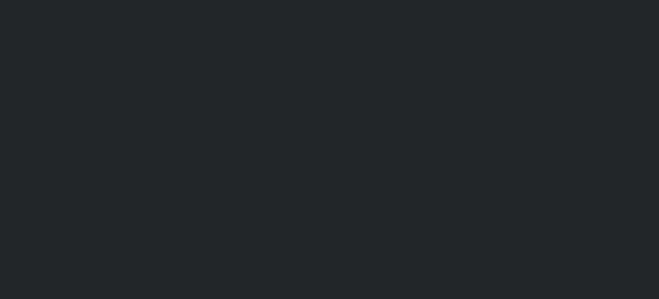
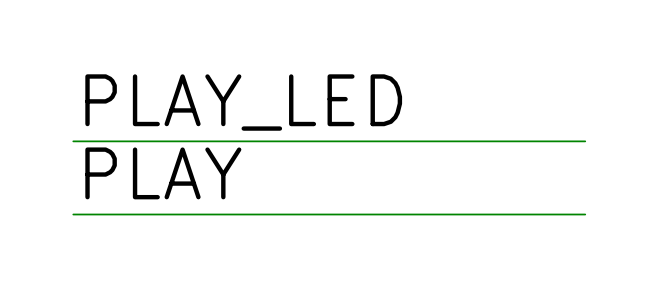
label: none -> PLAY_LED (243, 102)
wire: none -> (73, 141) (585, 141)
label: none -> PLAY (163, 173)
wire: none -> (73, 214) (585, 214)

